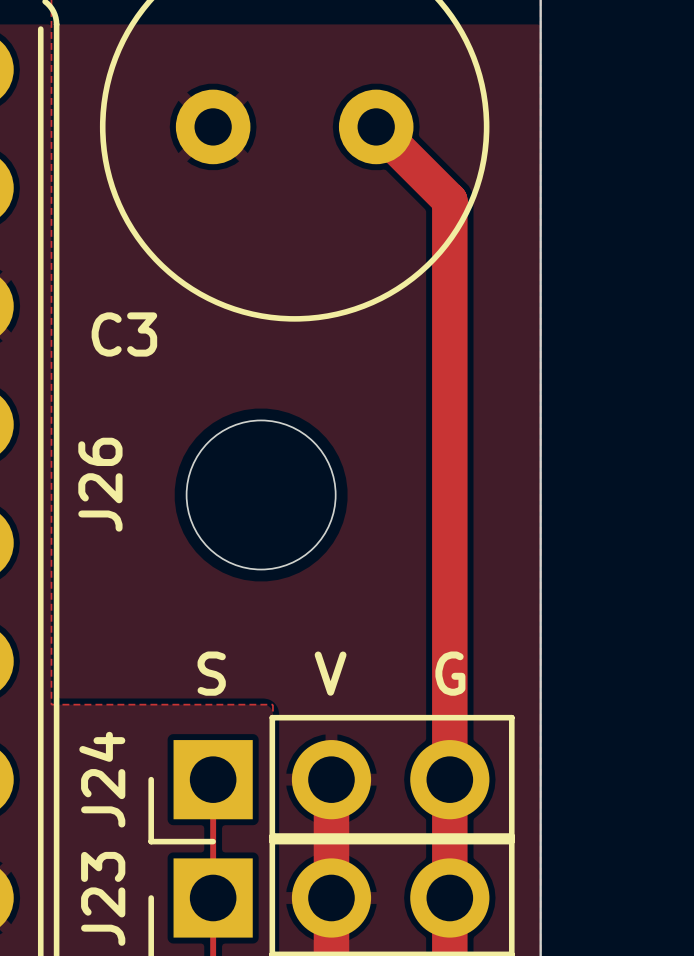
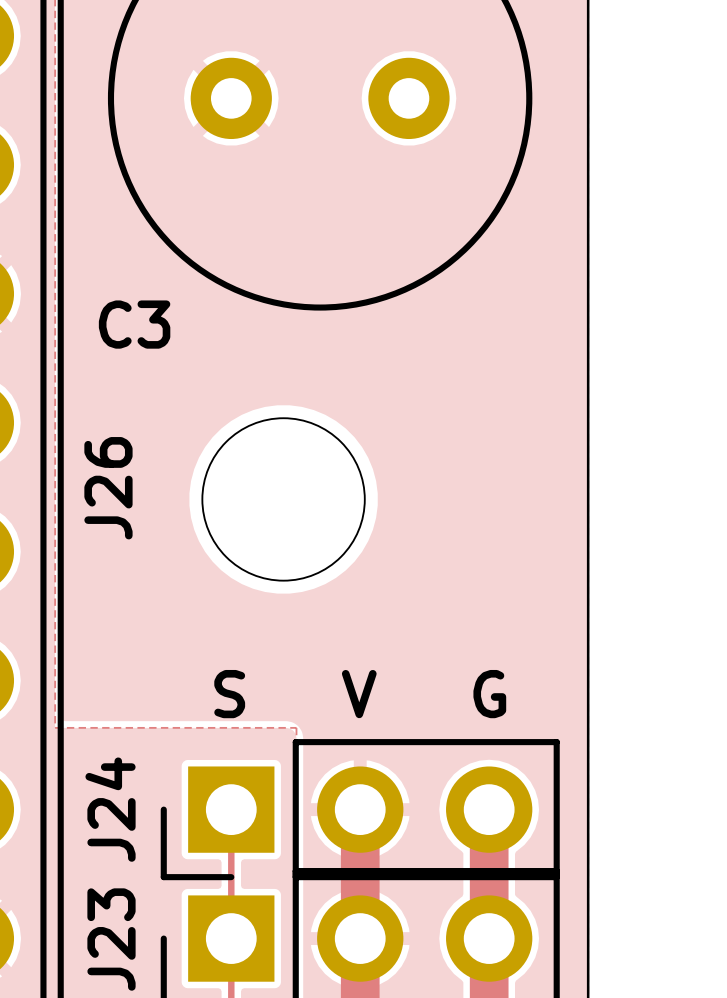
track: (376, 126) (449, 200) (449, 779) -> none

